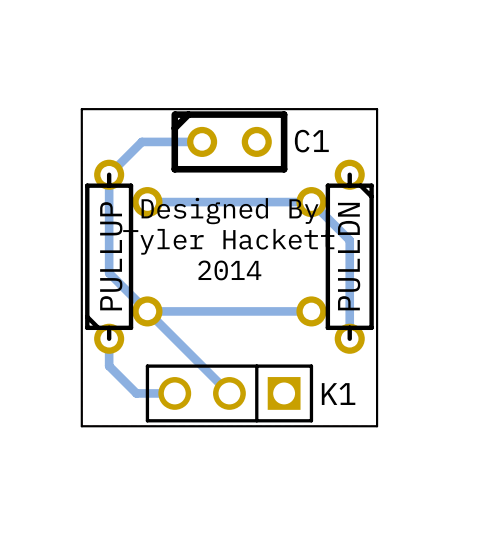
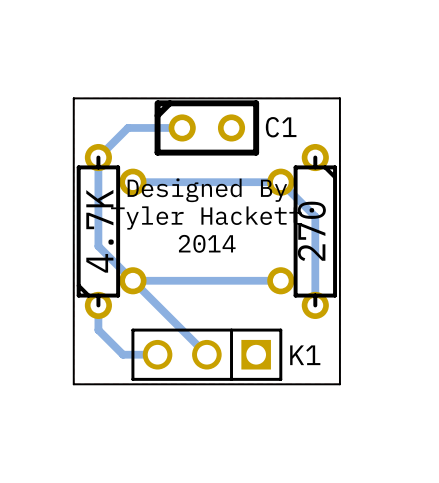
part value: PULLUP (111, 256) -> 4.7K (100, 231)
part value: PULLDN (349, 256) -> 270 (311, 231)

